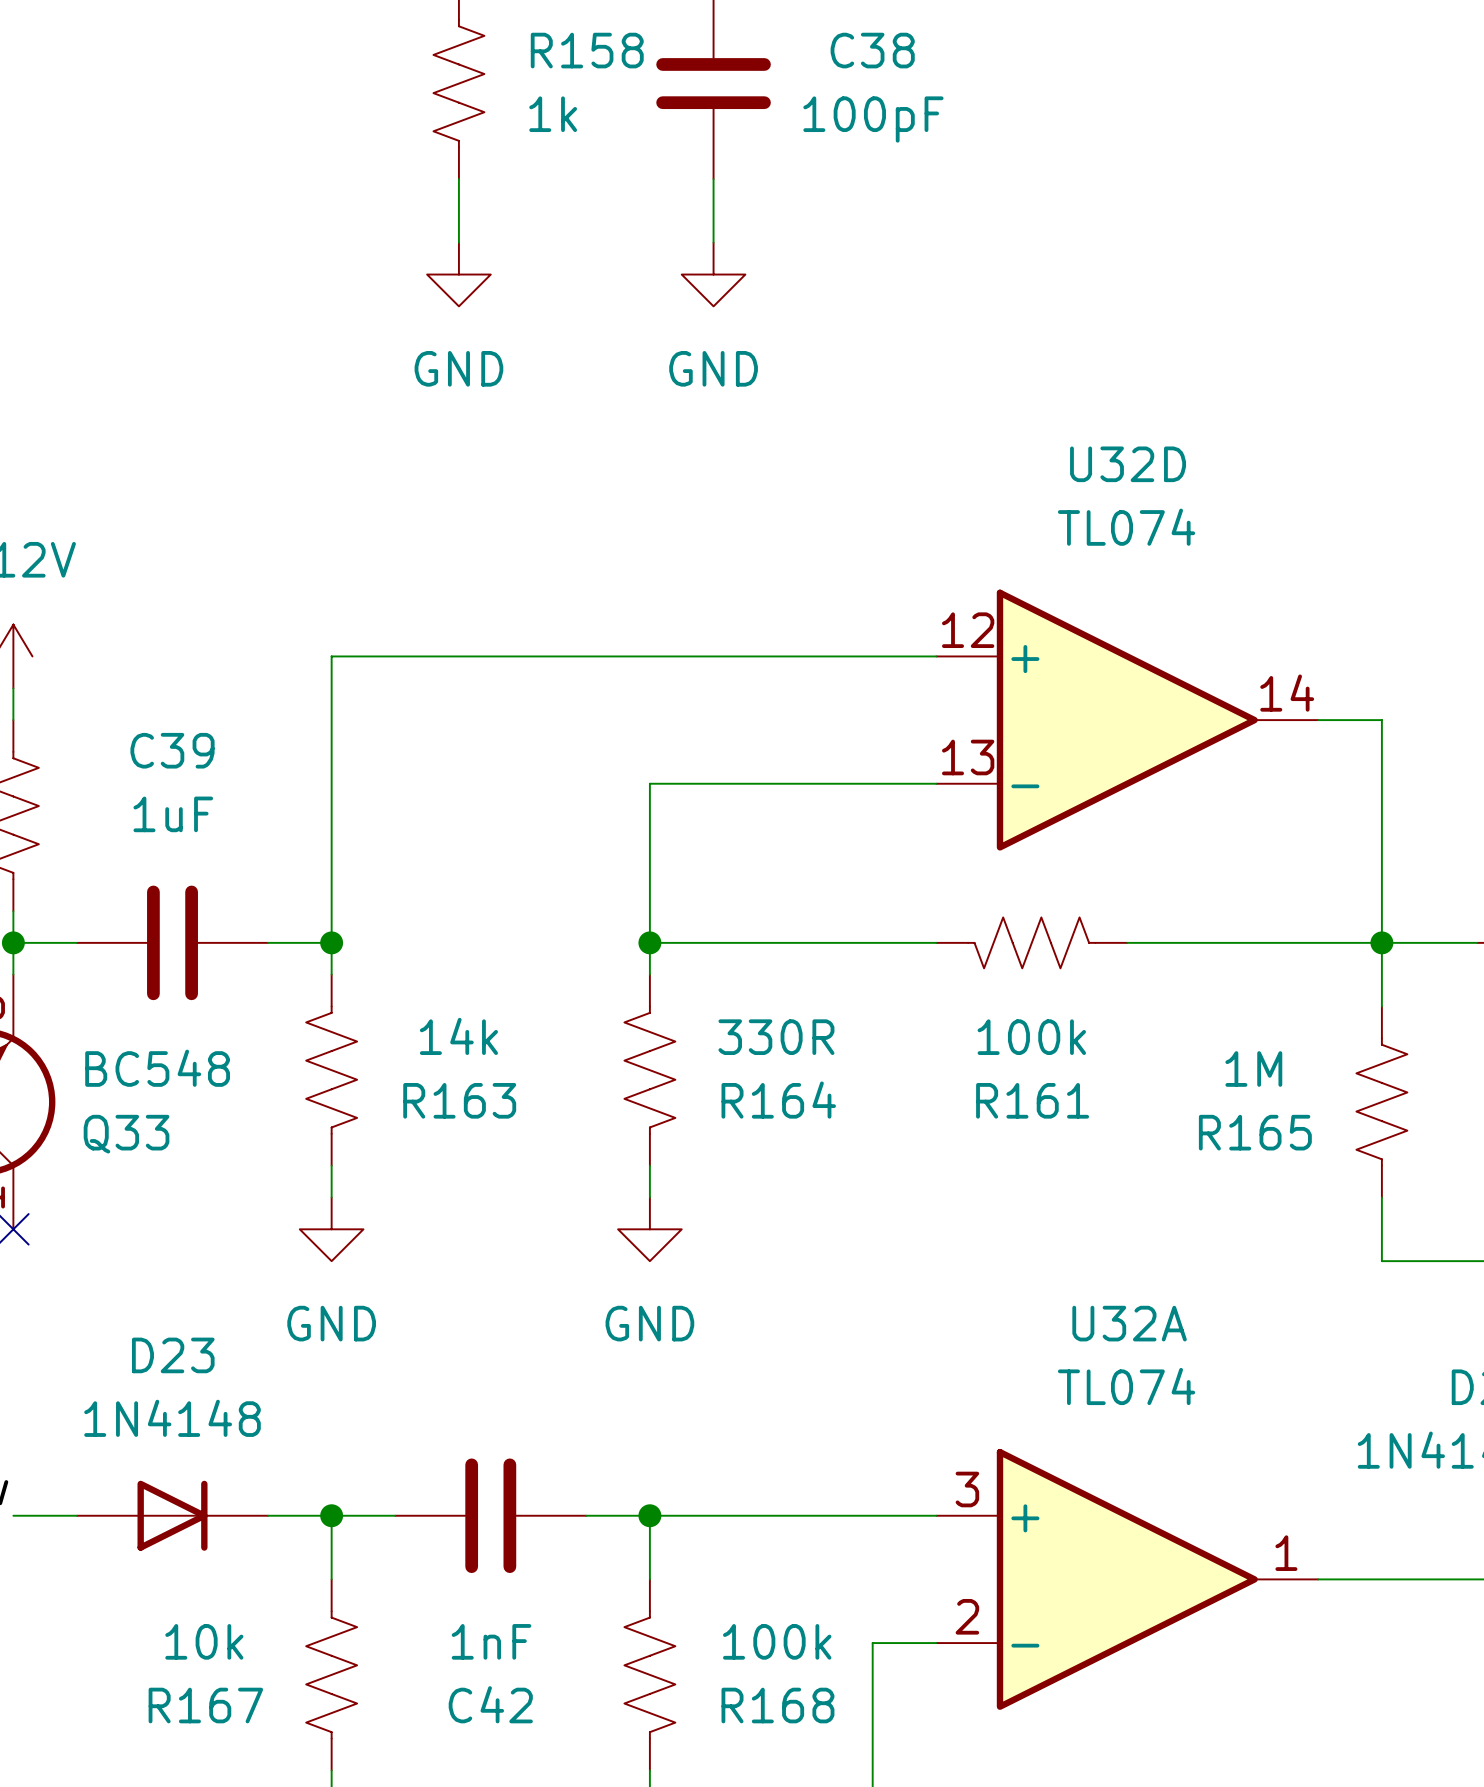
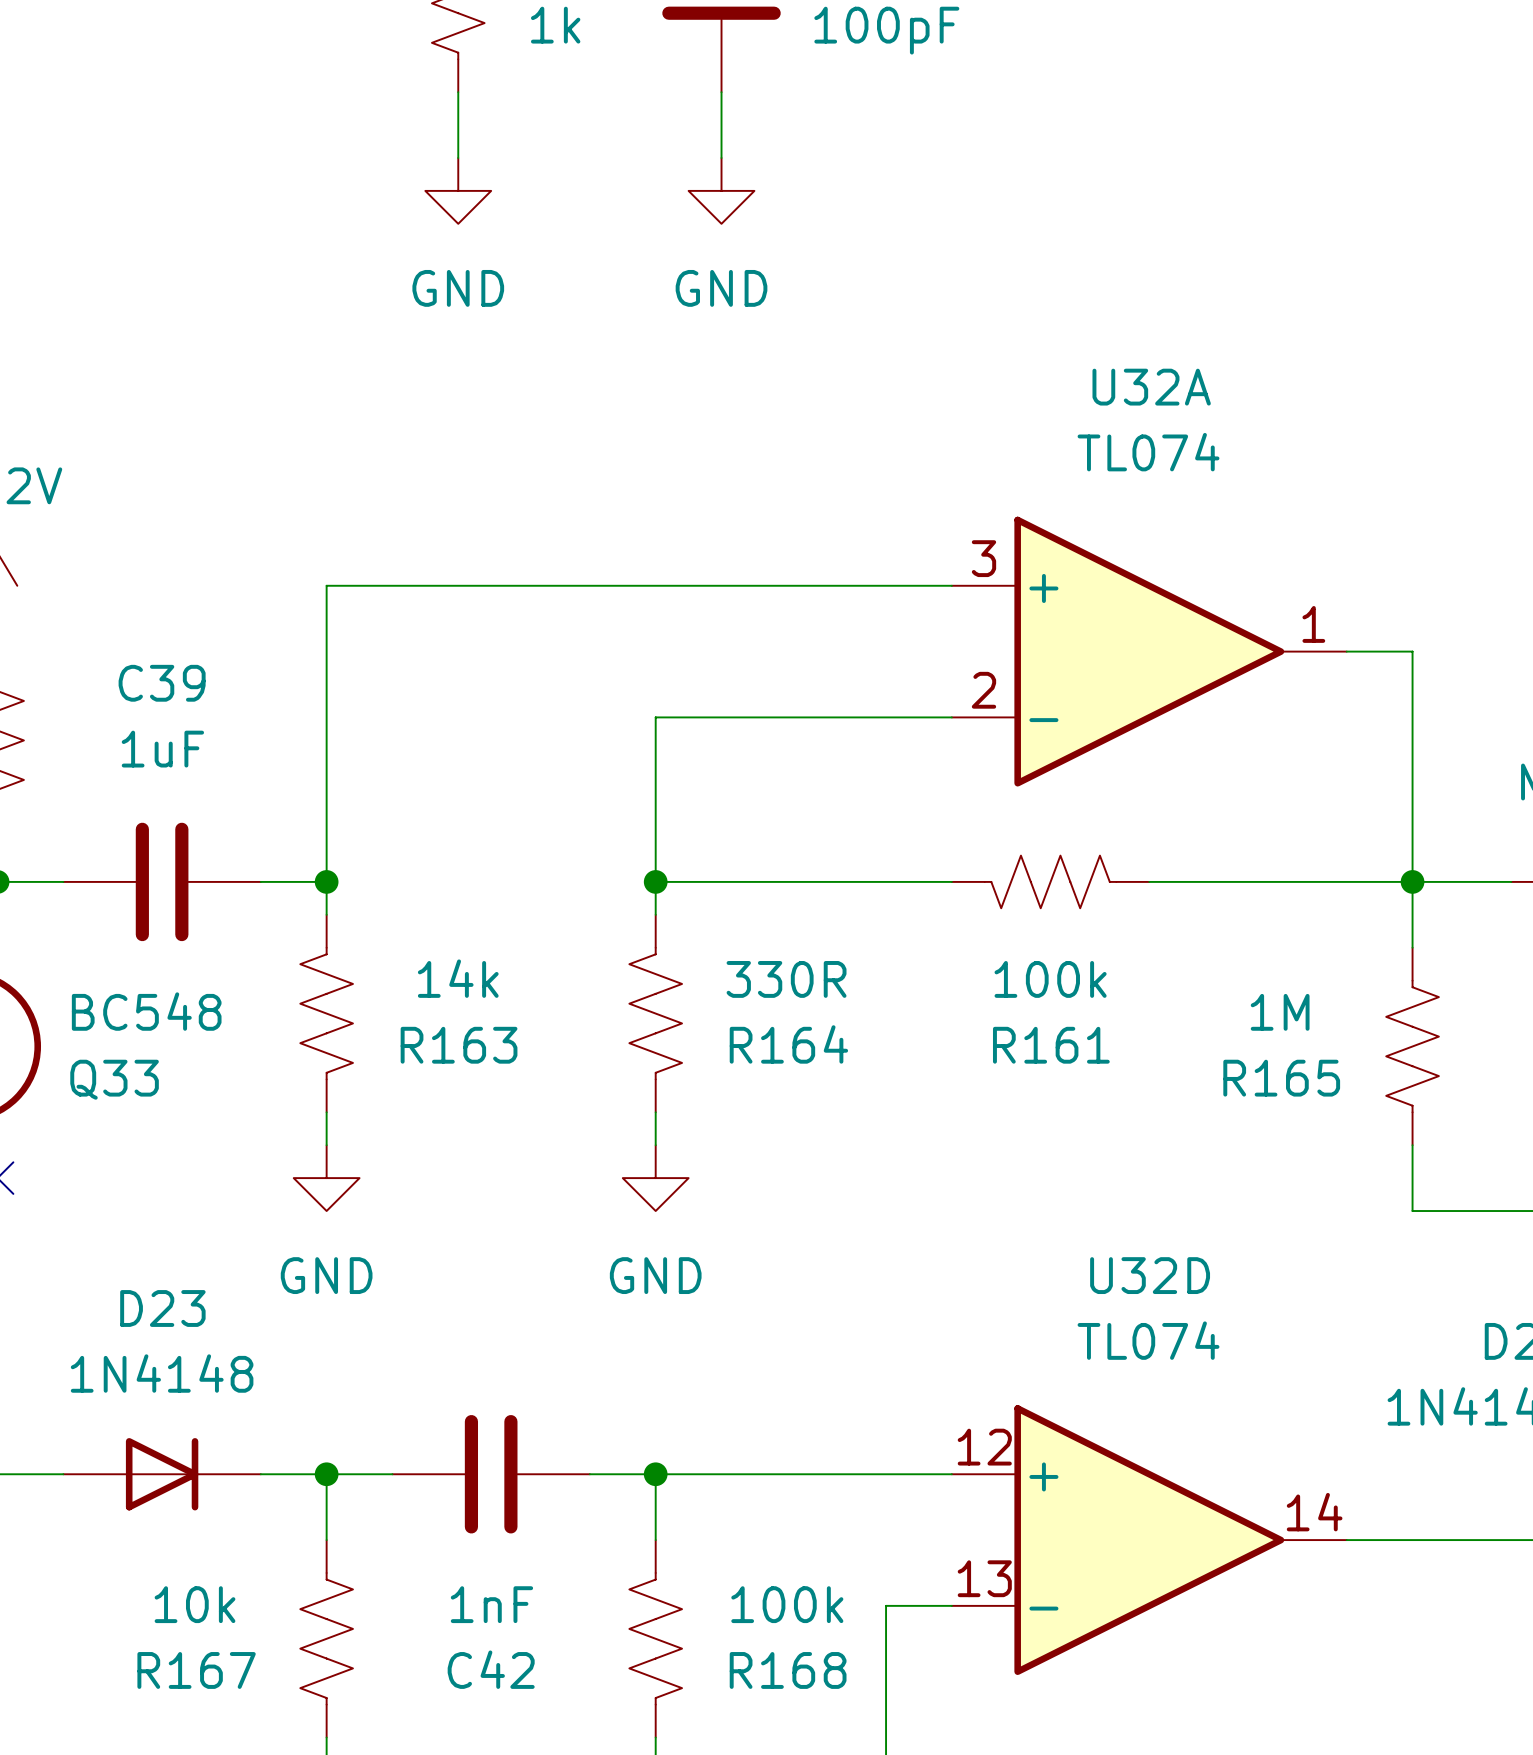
U32D position: (1127, 720) -> (1149, 1540)
U32A position: (1127, 1579) -> (1149, 651)

